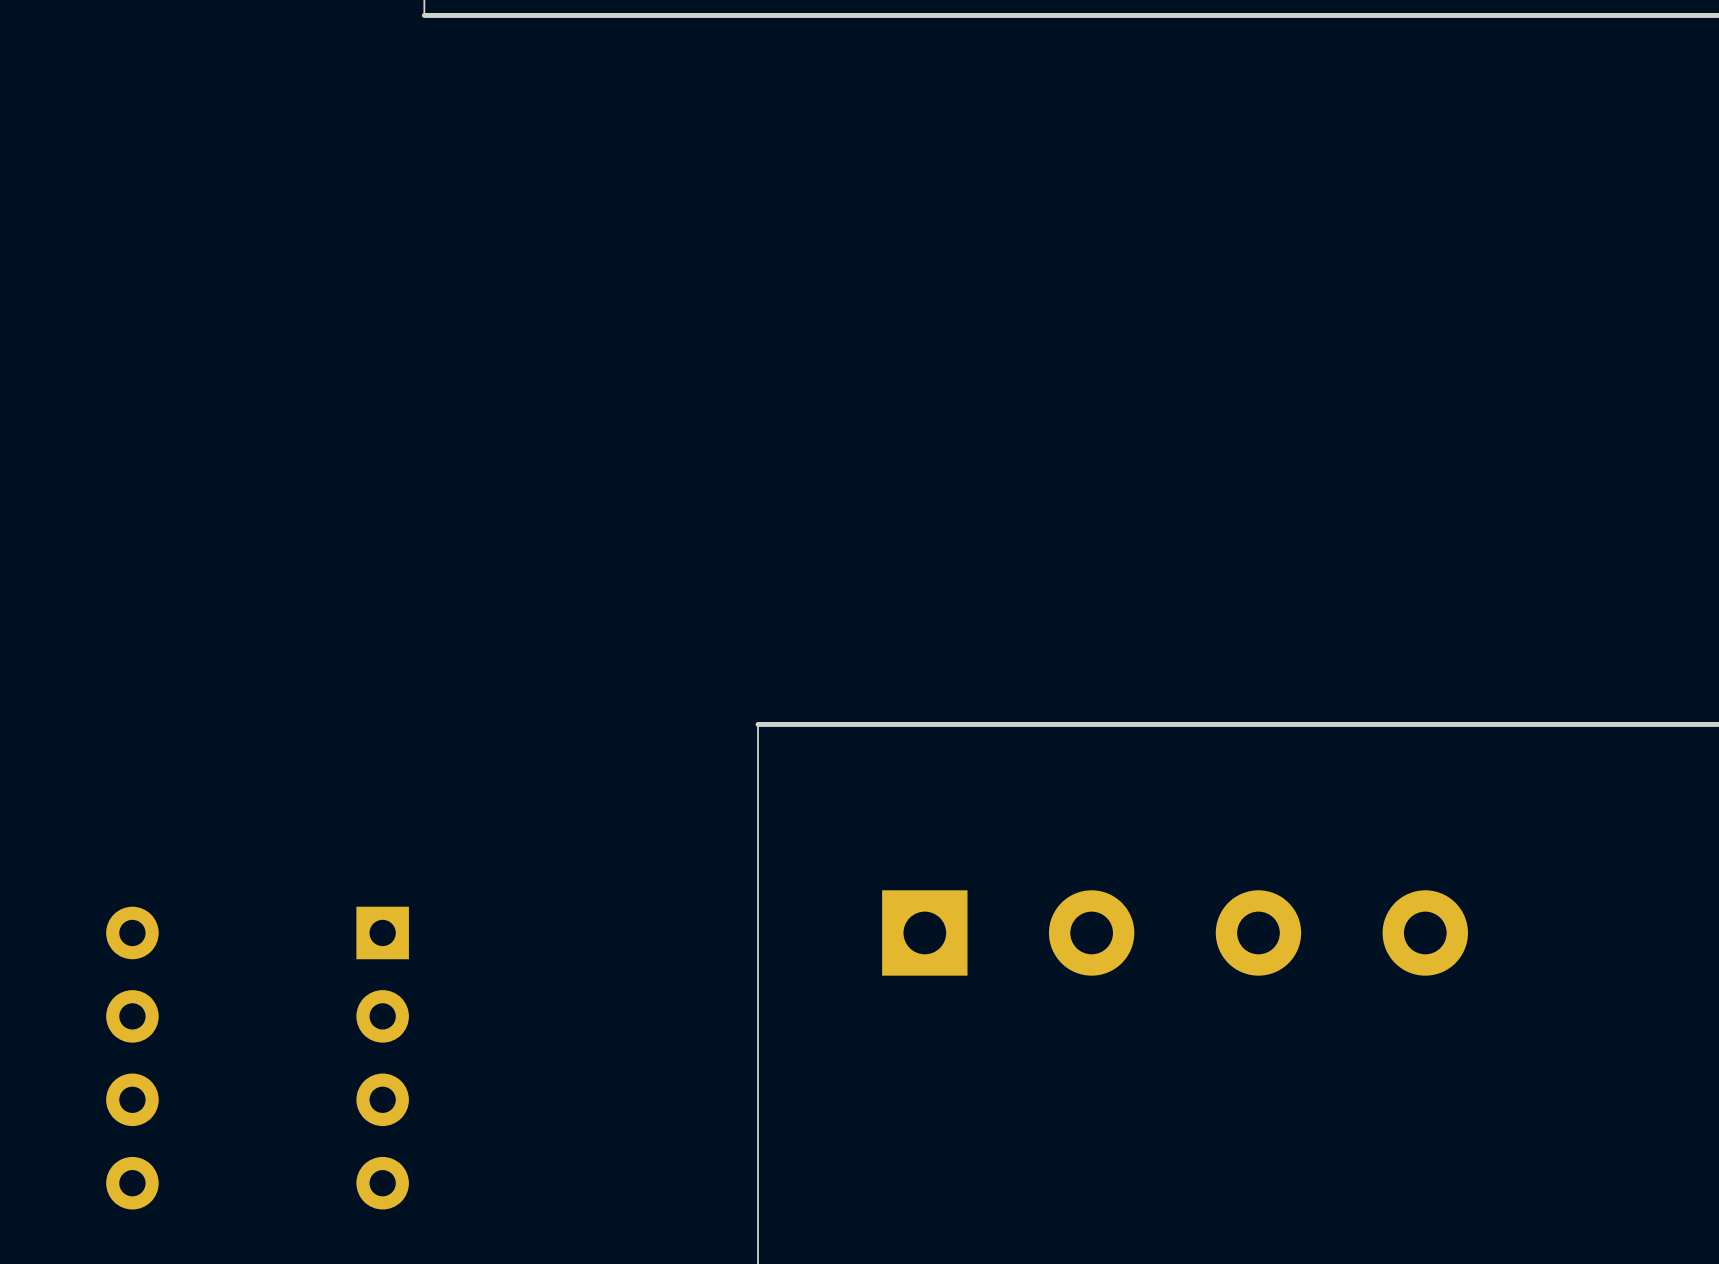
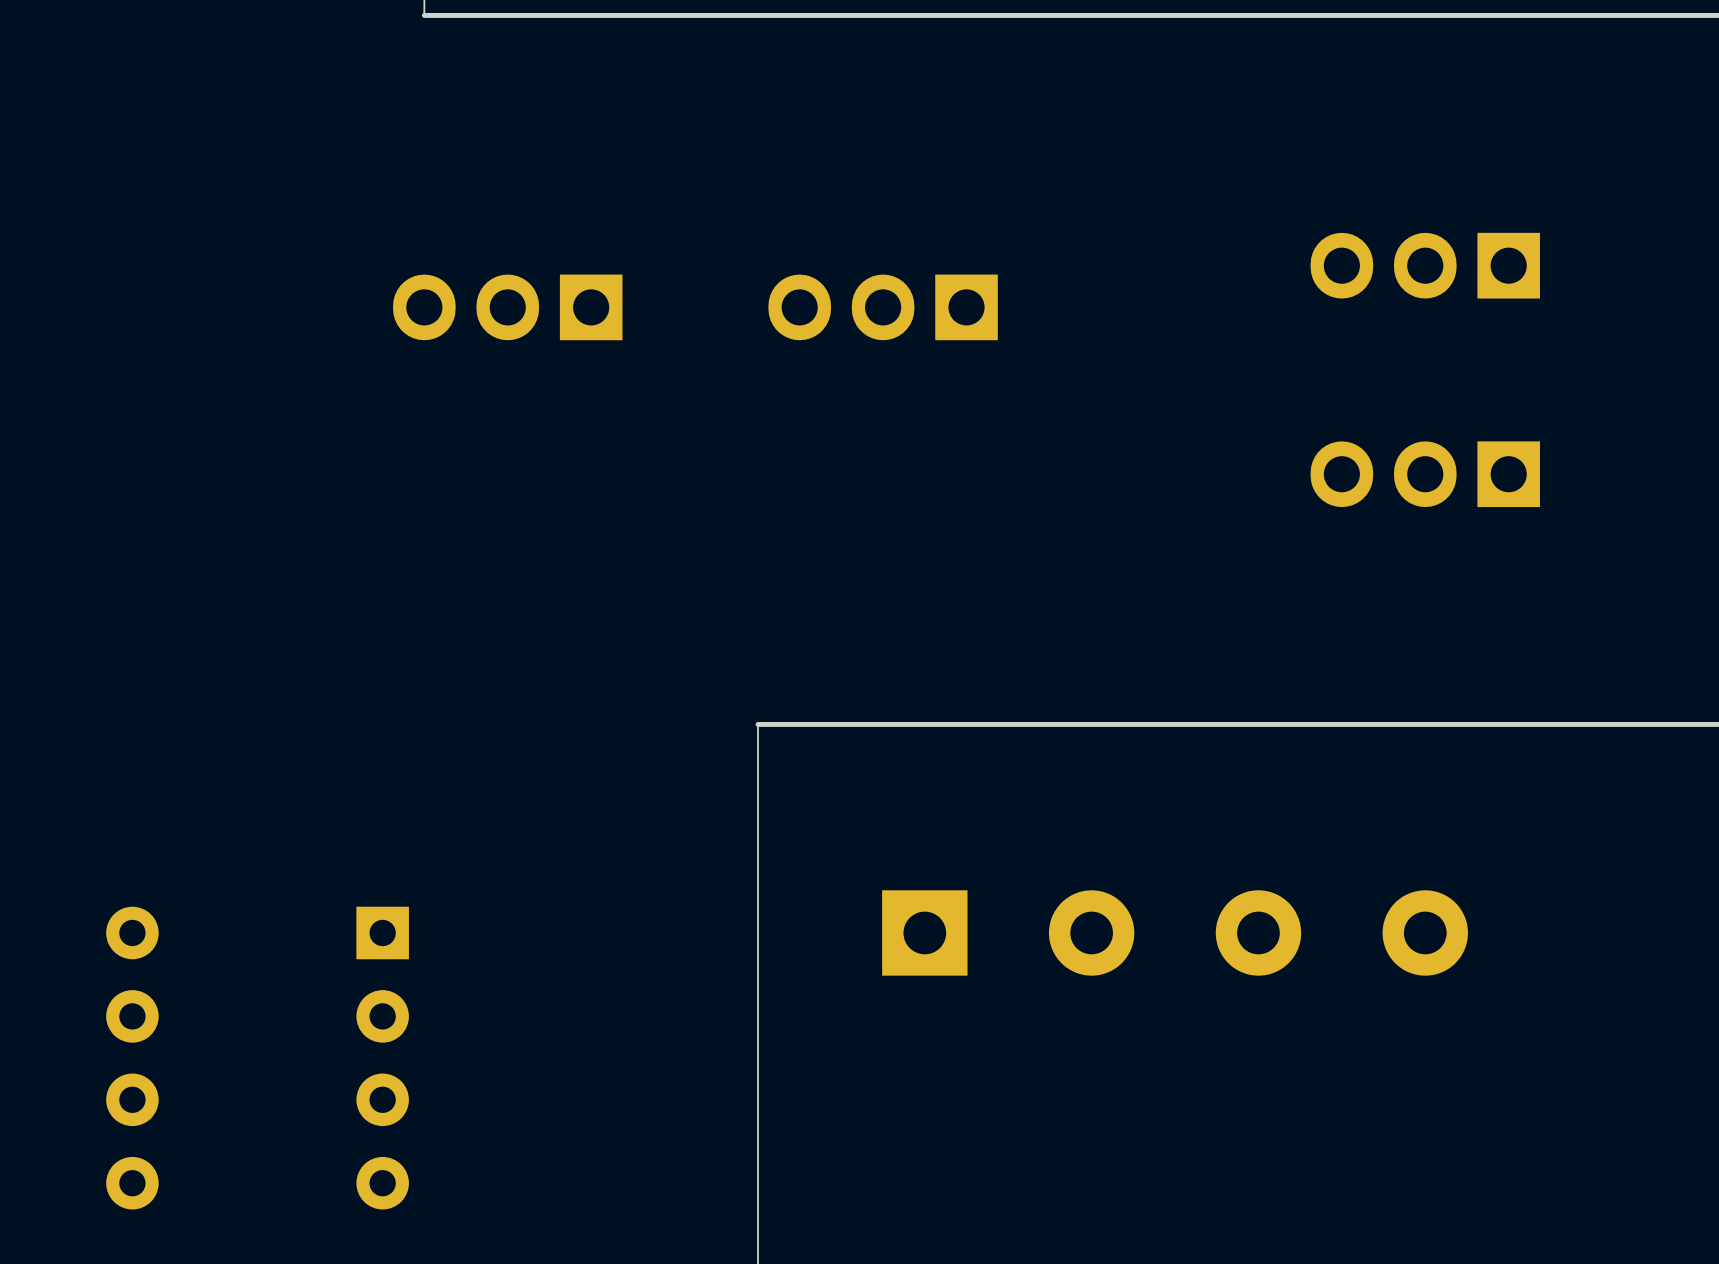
part: none -> (1425, 265)
part: none -> (507, 307)
part: none -> (883, 307)
part: none -> (1425, 474)

